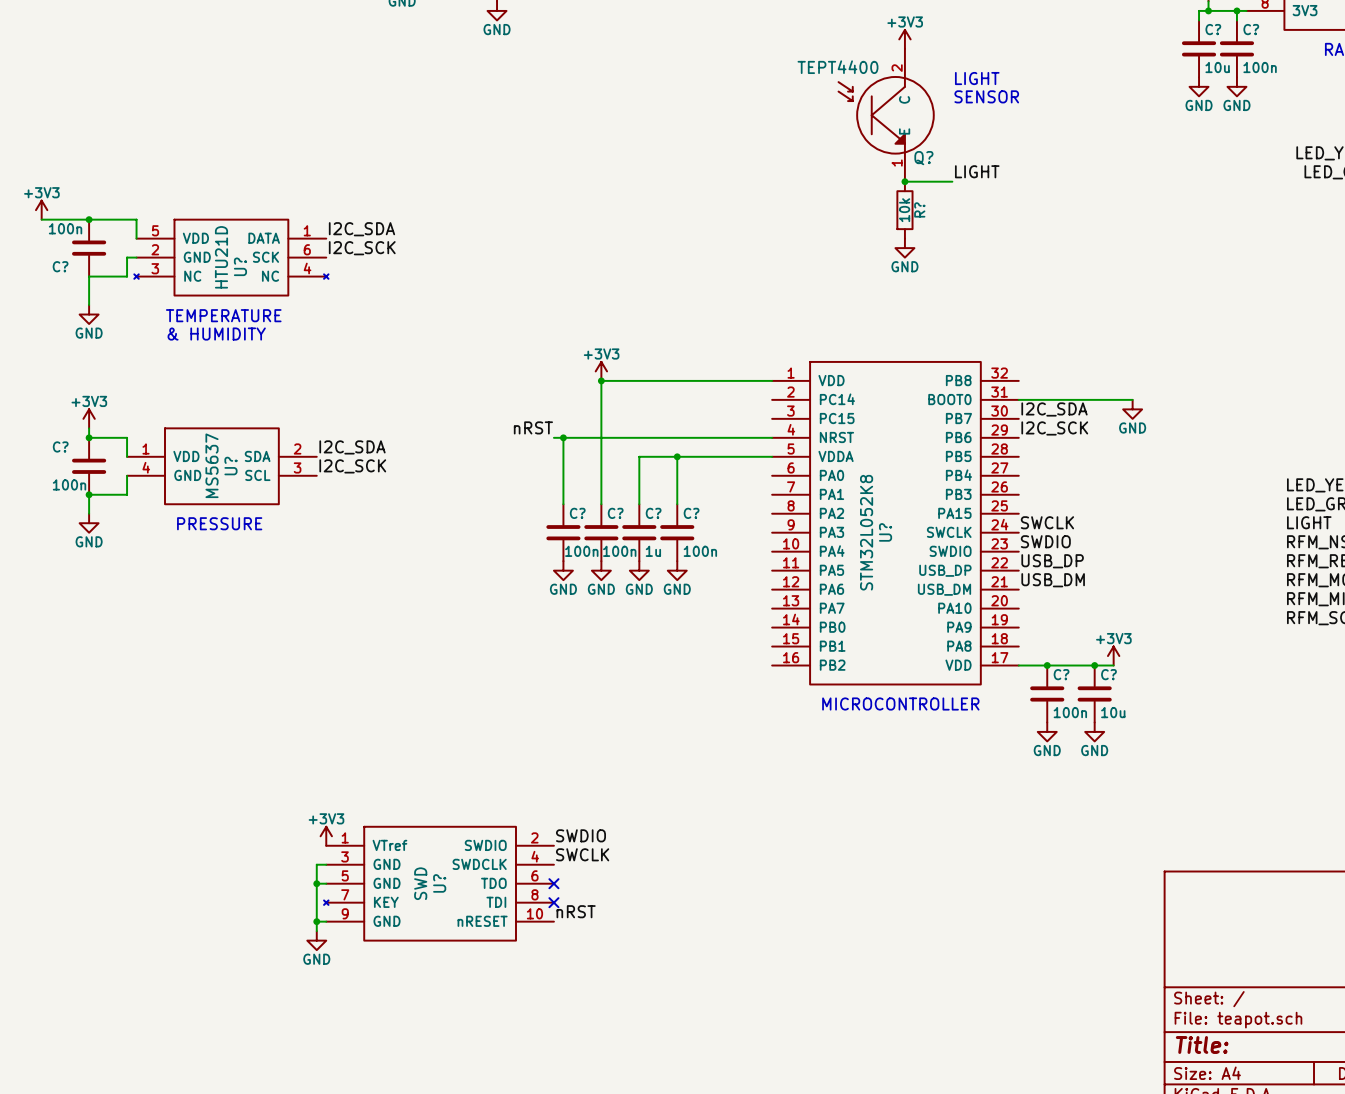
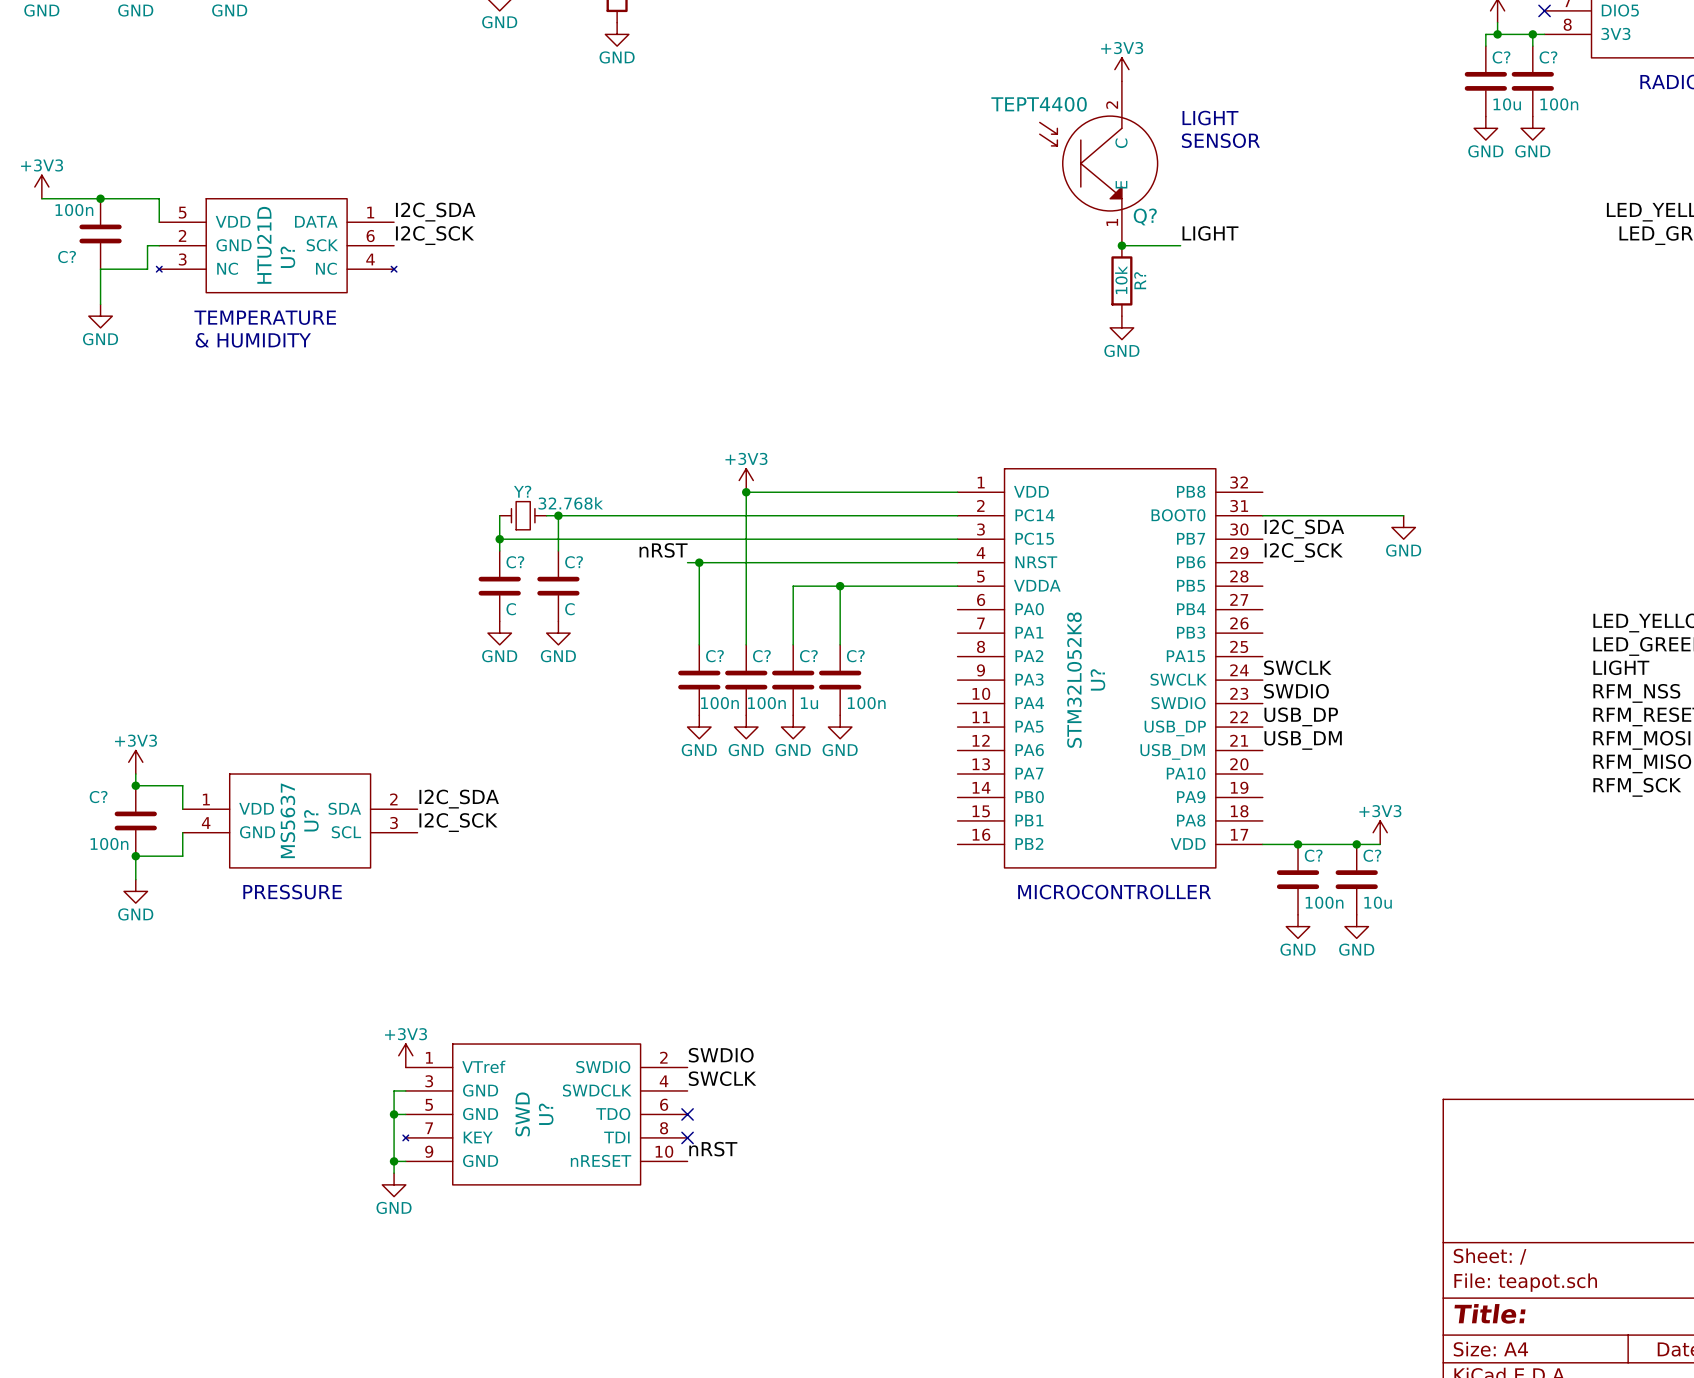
junction: none -> (100, 198)
power symbol position: +3V3 (41, 210) -> +3V3 (41, 187)
wire: (41, 219) (136, 219) (136, 238) -> (41, 198) (159, 198) (159, 222)
junction: (89, 219) -> none
label position: I2C_SDA (361, 229) -> I2C_SDA (435, 212)
C? position: (89, 248) -> (100, 233)
label position: I2C_SCK (362, 248) -> I2C_SCK (434, 235)
wire: (136, 257) (127, 257) (127, 276) (89, 276) (89, 305) -> (159, 245) (147, 245) (147, 269) (100, 269) (100, 304)
U? position: (231, 257) -> (276, 245)
power symbol position: GND (89, 314) -> GND (100, 316)
text position: TEMPERATURE (223, 315) -> TEMPERATURE (265, 317)
text position: & HUMIDITY (216, 334) -> & HUMIDITY (253, 340)
wire: none -> (499, 515) (499, 550)
Y?: none -> 32.768k (523, 515)
wire: none -> (546, 515) (957, 515)
wire: none -> (558, 515) (558, 550)
junction: none -> (558, 515)
power symbol: +3V3 (89, 418) -> none
wire: none -> (499, 539) (957, 539)
junction: none -> (499, 539)
wire: (89, 428) (89, 437) (127, 437) (127, 456) -> (135, 774) (135, 785) (182, 785) (182, 809)
junction: (89, 437) -> none
label: I2C_SDA (352, 447) -> none
C?: none -> C (499, 586)
C?: none -> C (558, 586)
C?: 100n (89, 466) -> none
U? position: (221, 466) -> (300, 820)
label: I2C_SCK (352, 466) -> none
wire: (127, 475) (127, 494) (89, 494) (89, 513) -> (182, 832) (182, 856) (135, 856) (135, 879)
junction: (89, 494) -> none
power symbol: none -> GND (499, 633)
power symbol: none -> GND (558, 633)
power symbol: GND (89, 523) -> none
text position: PRESSURE (219, 523) -> PRESSURE (292, 892)
power symbol: none -> +3V3 (135, 762)
junction: none -> (135, 785)
label: none -> I2C_SDA (459, 799)
C?: none -> 100n (135, 820)
label: none -> I2C_SCK (458, 822)
junction: none -> (135, 856)
power symbol: none -> GND (135, 891)

